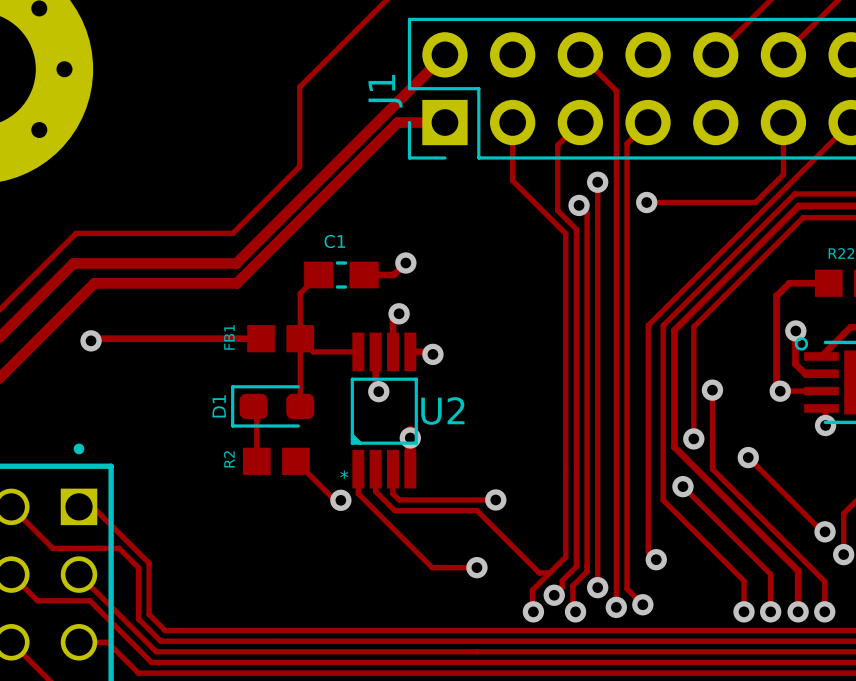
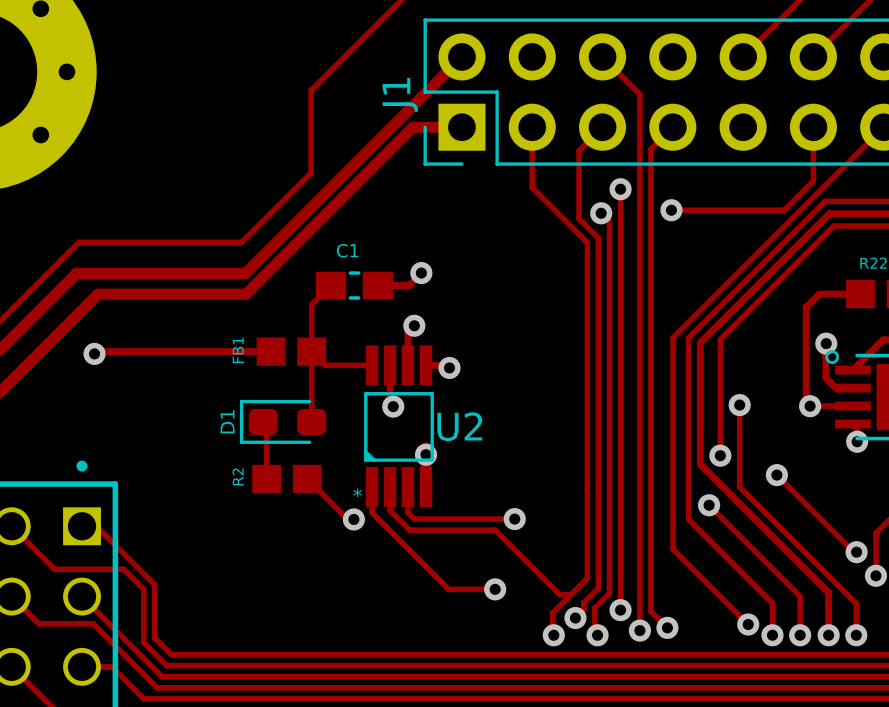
track: (648, 529) (648, 551) (656, 559) -> (673, 549) (748, 624)
via: (656, 559) -> none
via: none -> (748, 624)

